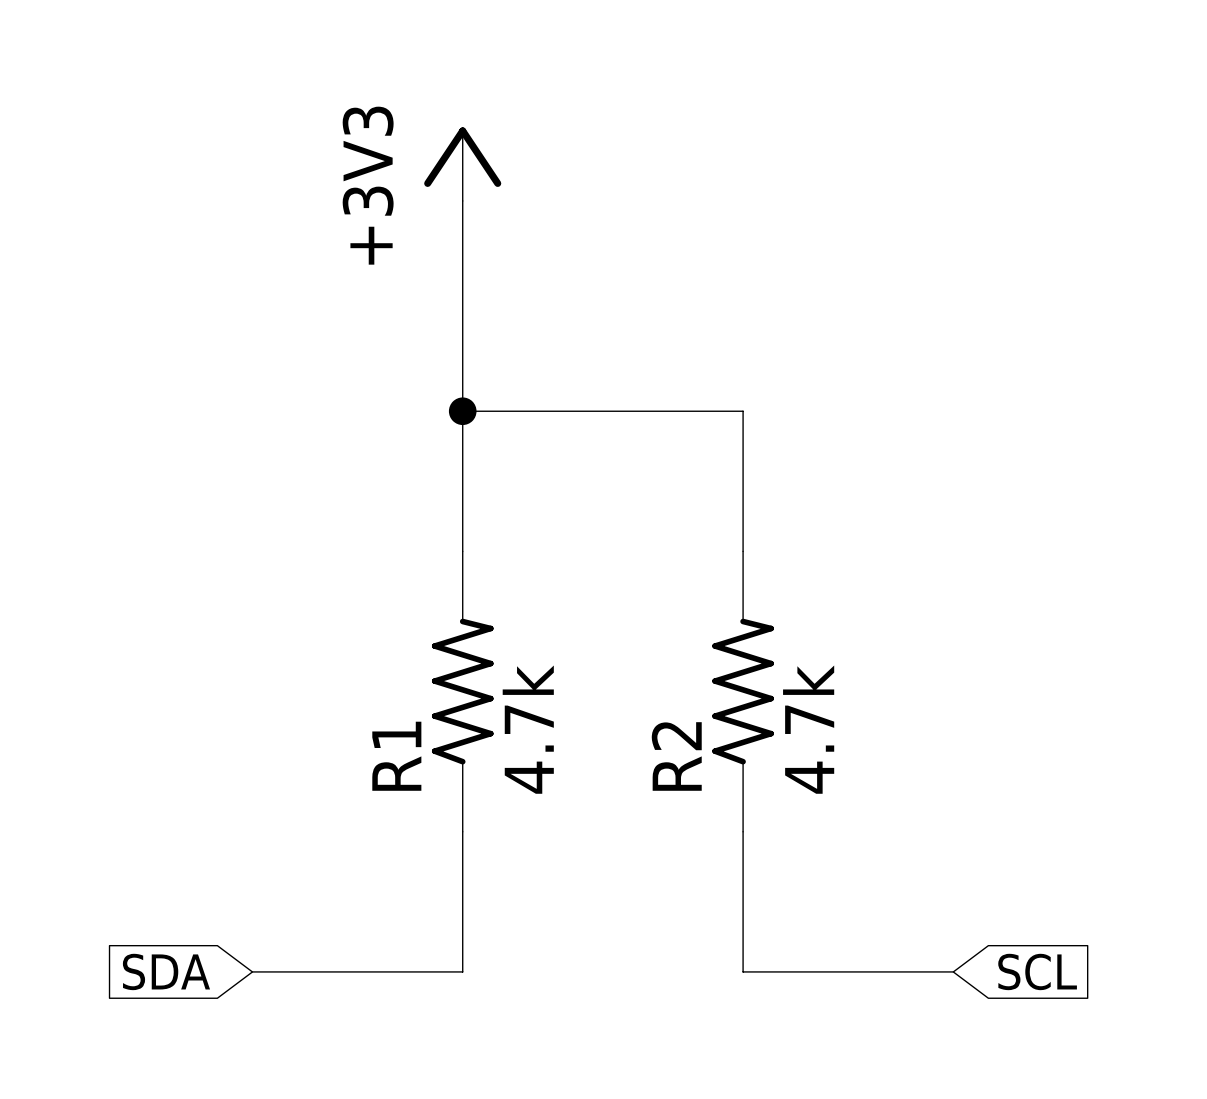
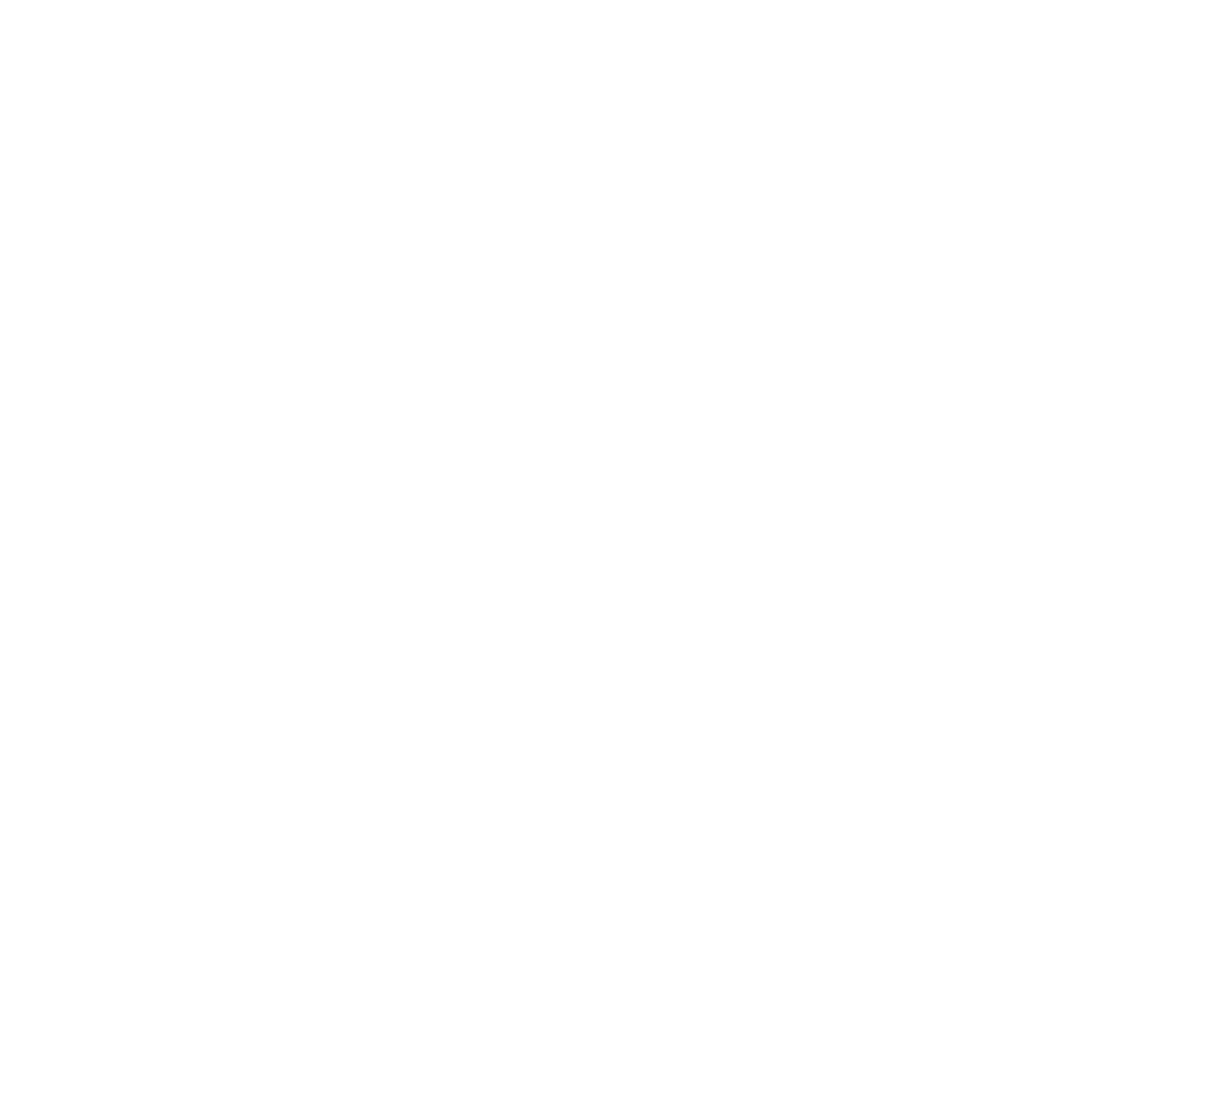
power symbol: +3V3 (462, 164) -> none
wire: (462, 200) (462, 551) -> none
wire: (462, 411) (743, 411) (743, 551) -> none
junction: (462, 411) -> none
R1: 4.7k (462, 691) -> none
R2: 4.7k (743, 691) -> none
wire: (462, 831) (462, 971) (252, 971) -> none
wire: (743, 831) (743, 971) (953, 971) -> none
global label: SDA (166, 971) -> none
global label: SCL (1037, 971) -> none

